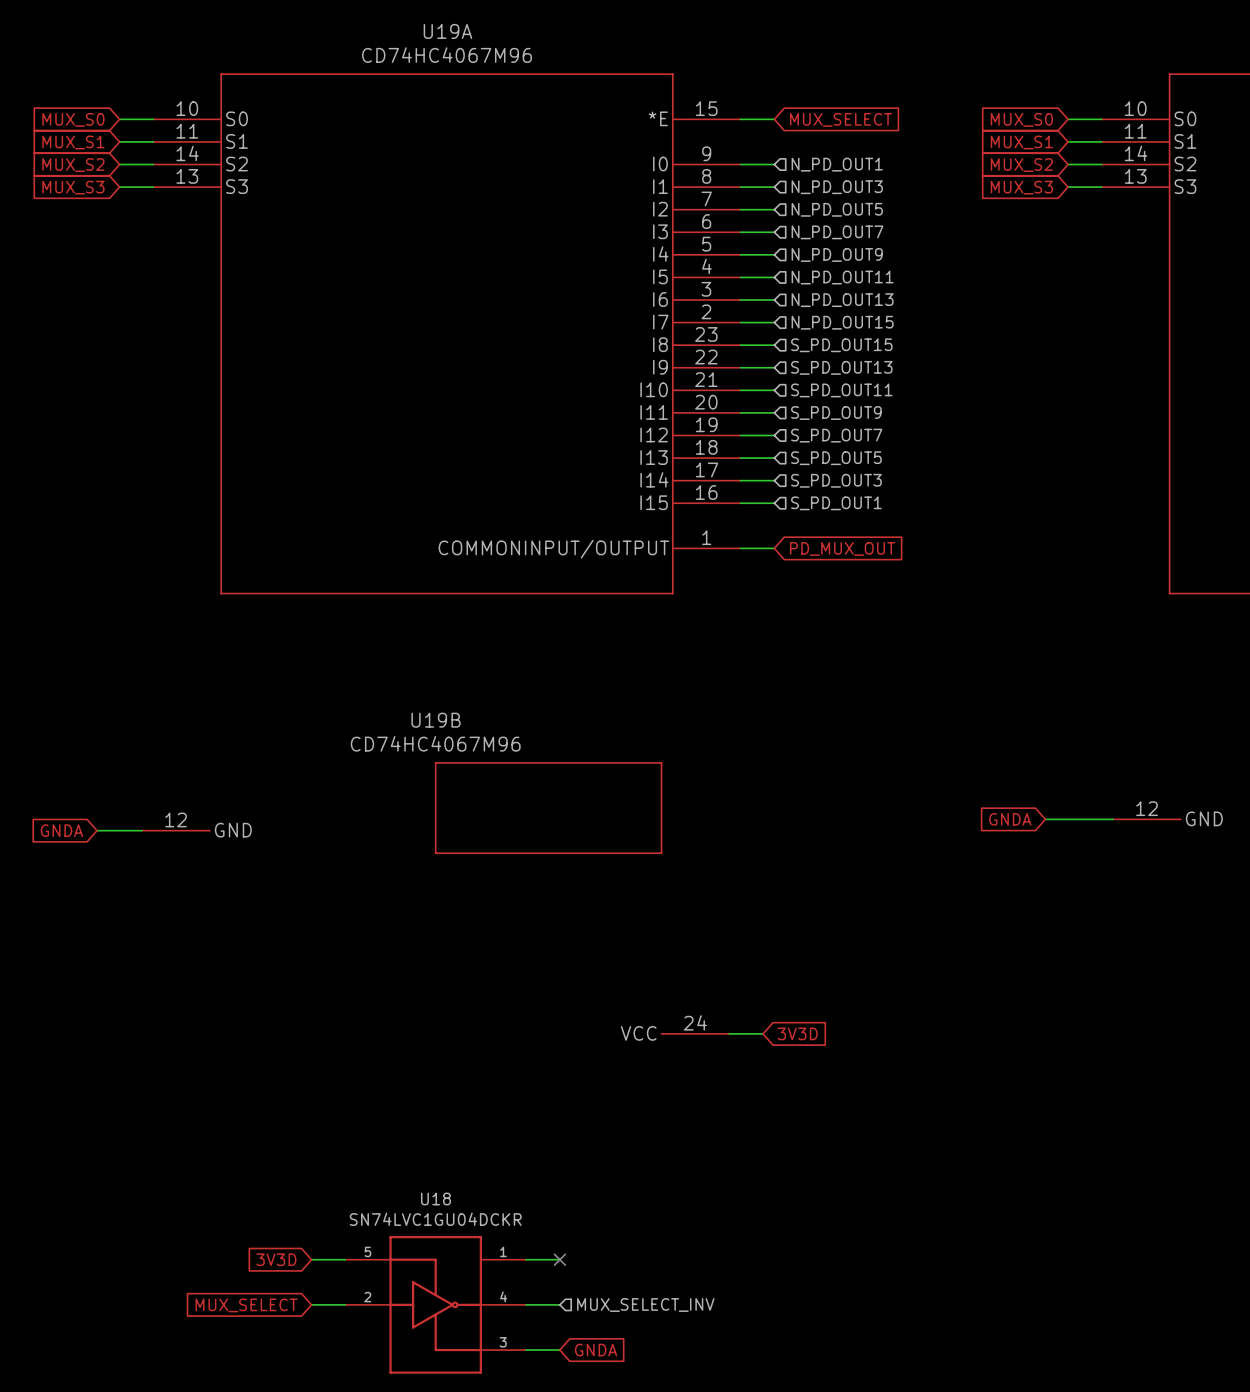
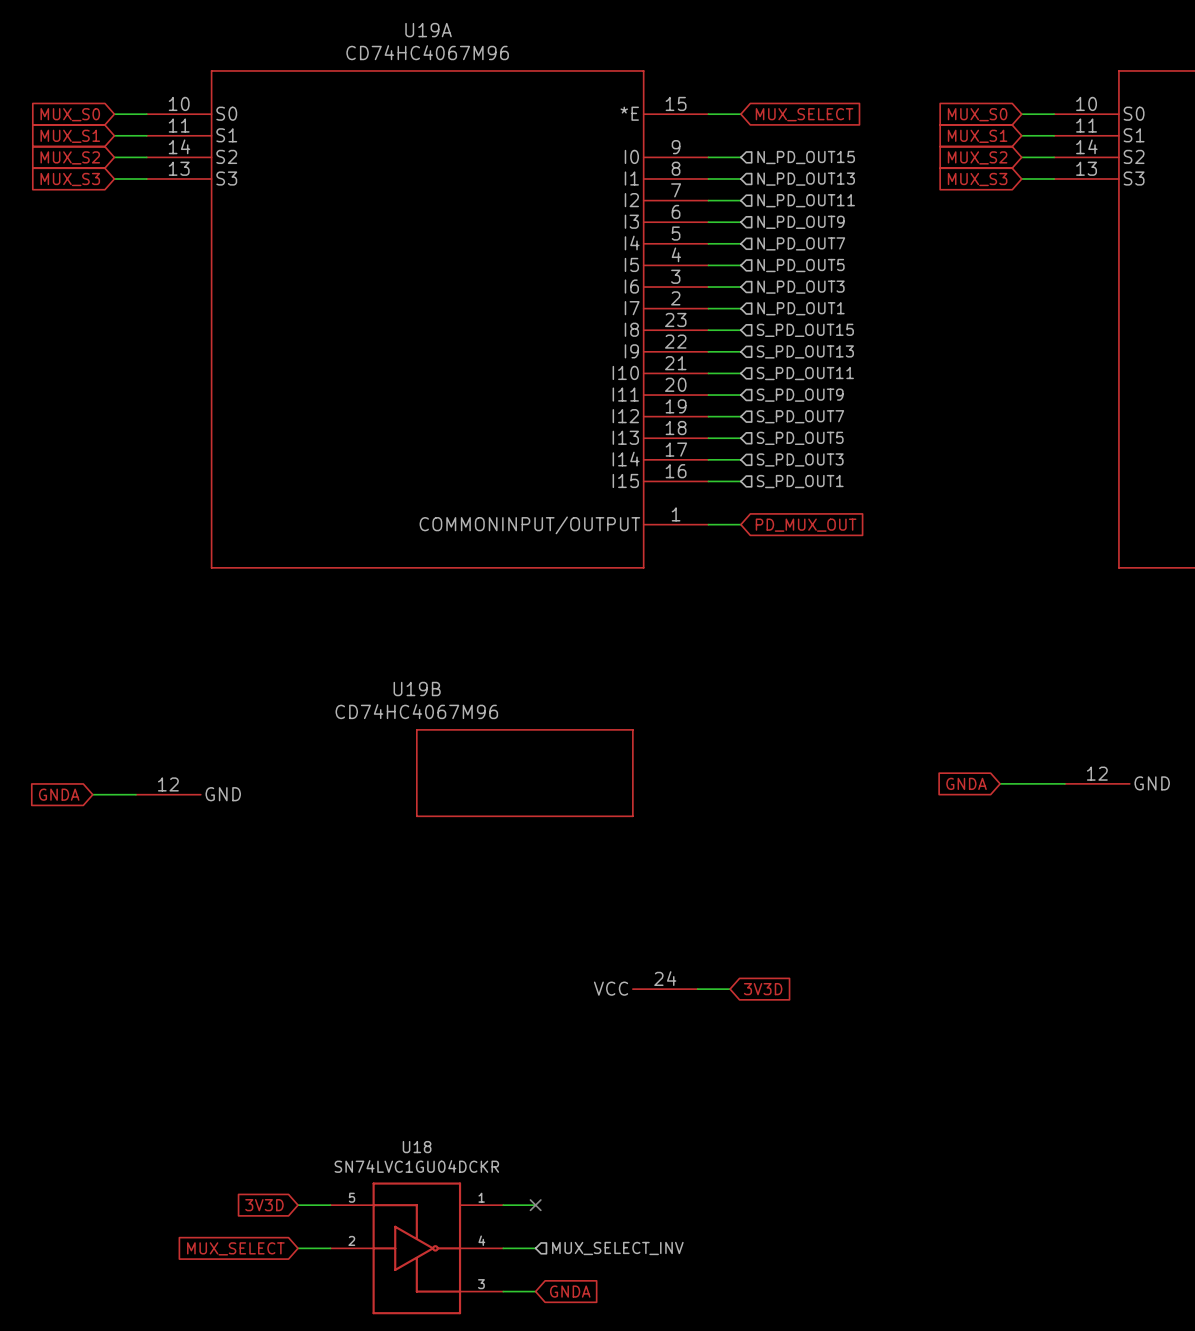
hierarchical label: N_PD_OUT1 (837, 164) -> N_PD_OUT15 (806, 157)
hierarchical label: N_PD_OUT3 (837, 187) -> N_PD_OUT13 (806, 179)
hierarchical label: N_PD_OUT5 (837, 209) -> N_PD_OUT11 (806, 200)
hierarchical label: N_PD_OUT7 (837, 232) -> N_PD_OUT9 (800, 222)
hierarchical label: N_PD_OUT9 (837, 254) -> N_PD_OUT7 (801, 243)
hierarchical label: N_PD_OUT11 (842, 277) -> N_PD_OUT5 (800, 265)
hierarchical label: N_PD_OUT13 (842, 300) -> N_PD_OUT3 (800, 287)
hierarchical label: N_PD_OUT15 (842, 322) -> N_PD_OUT1 (800, 308)

